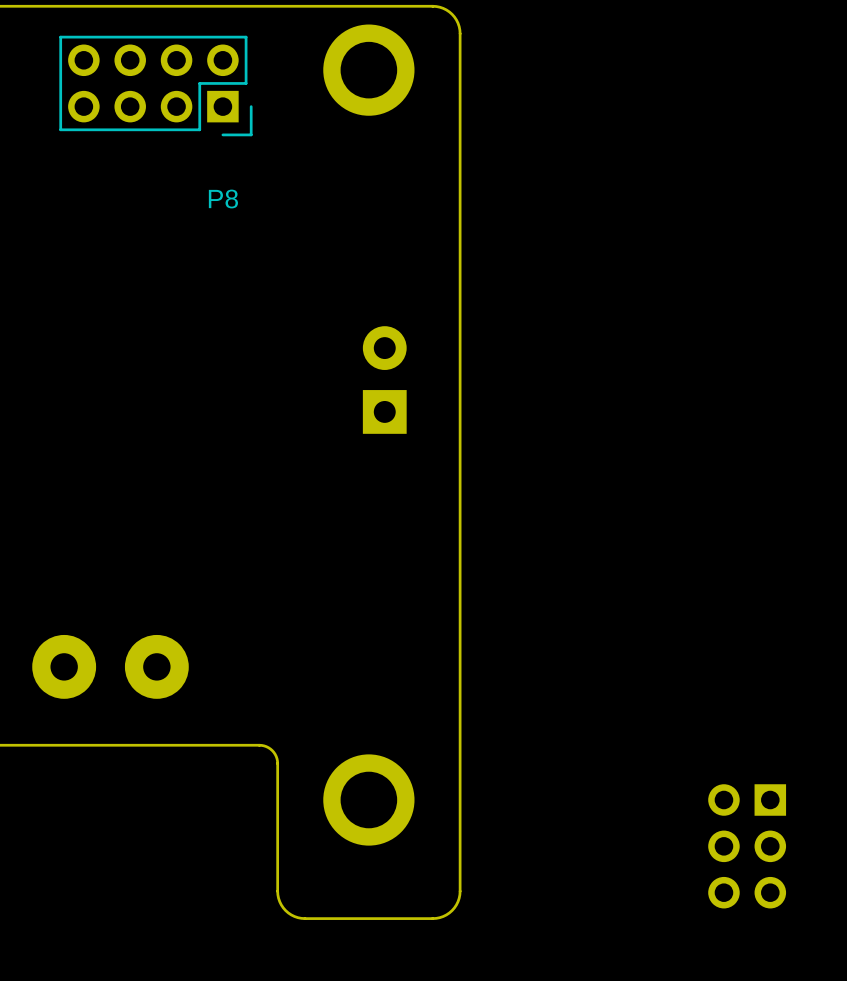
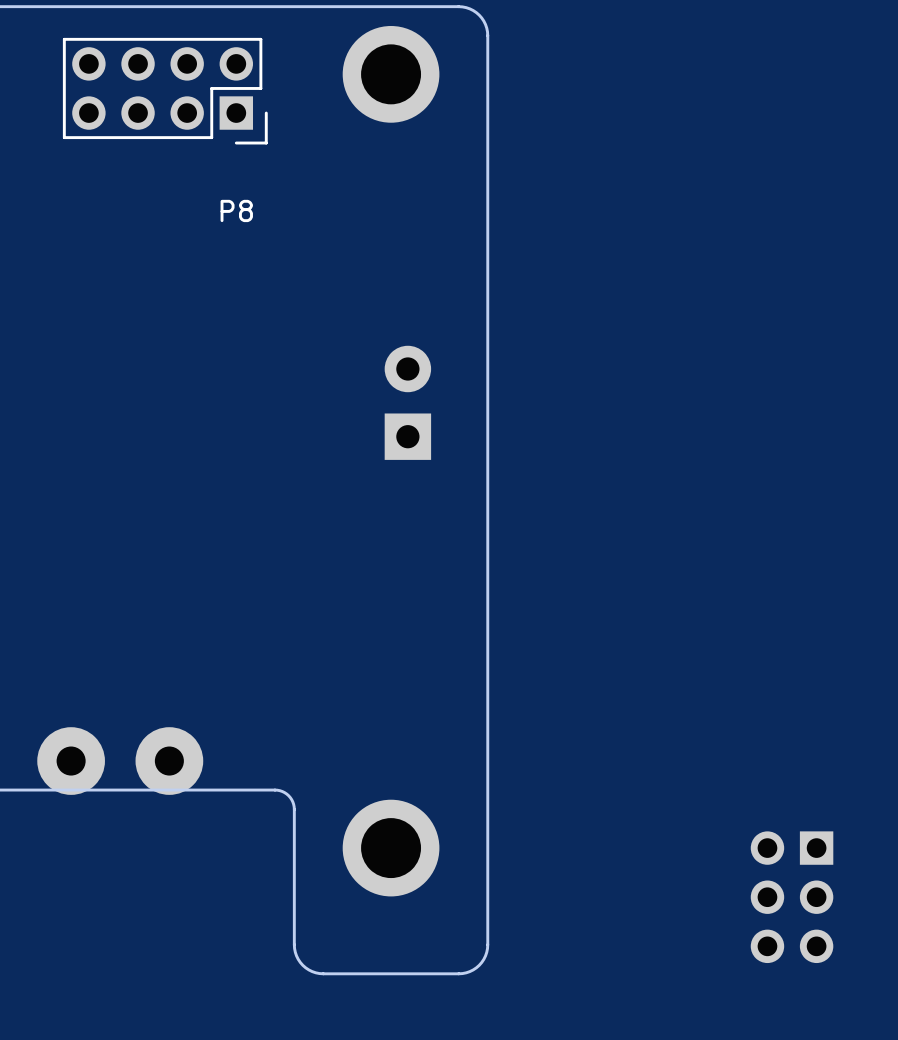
part position: (110, 666) -> (120, 761)

